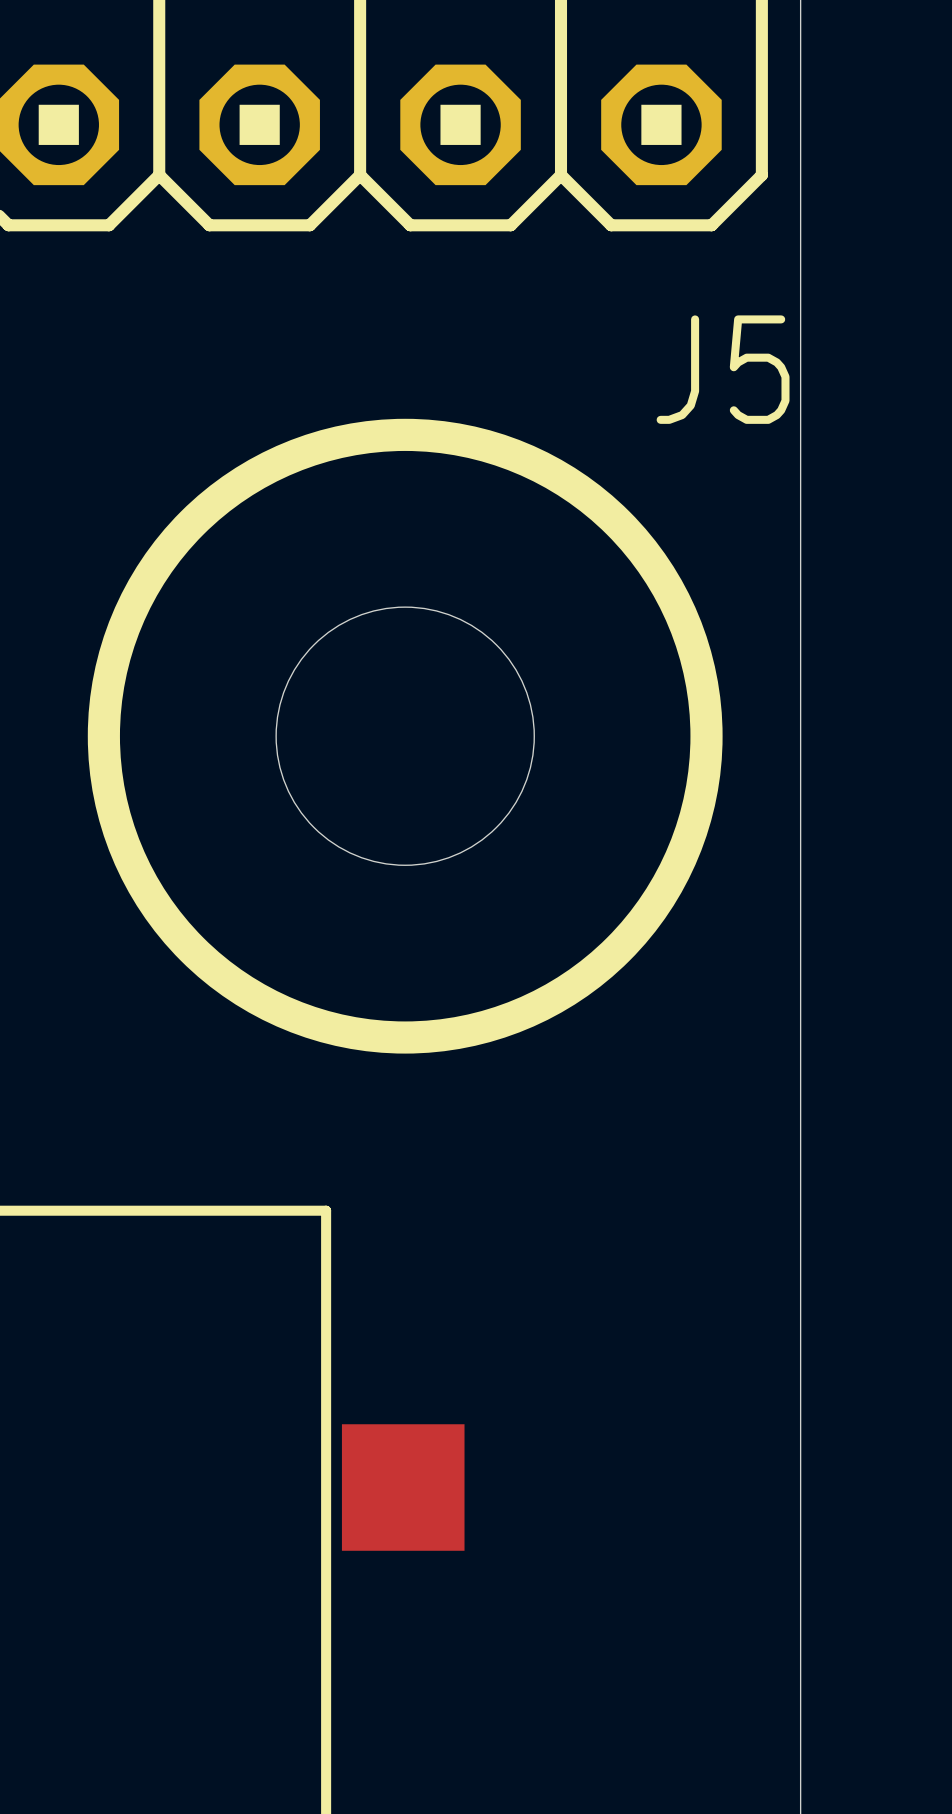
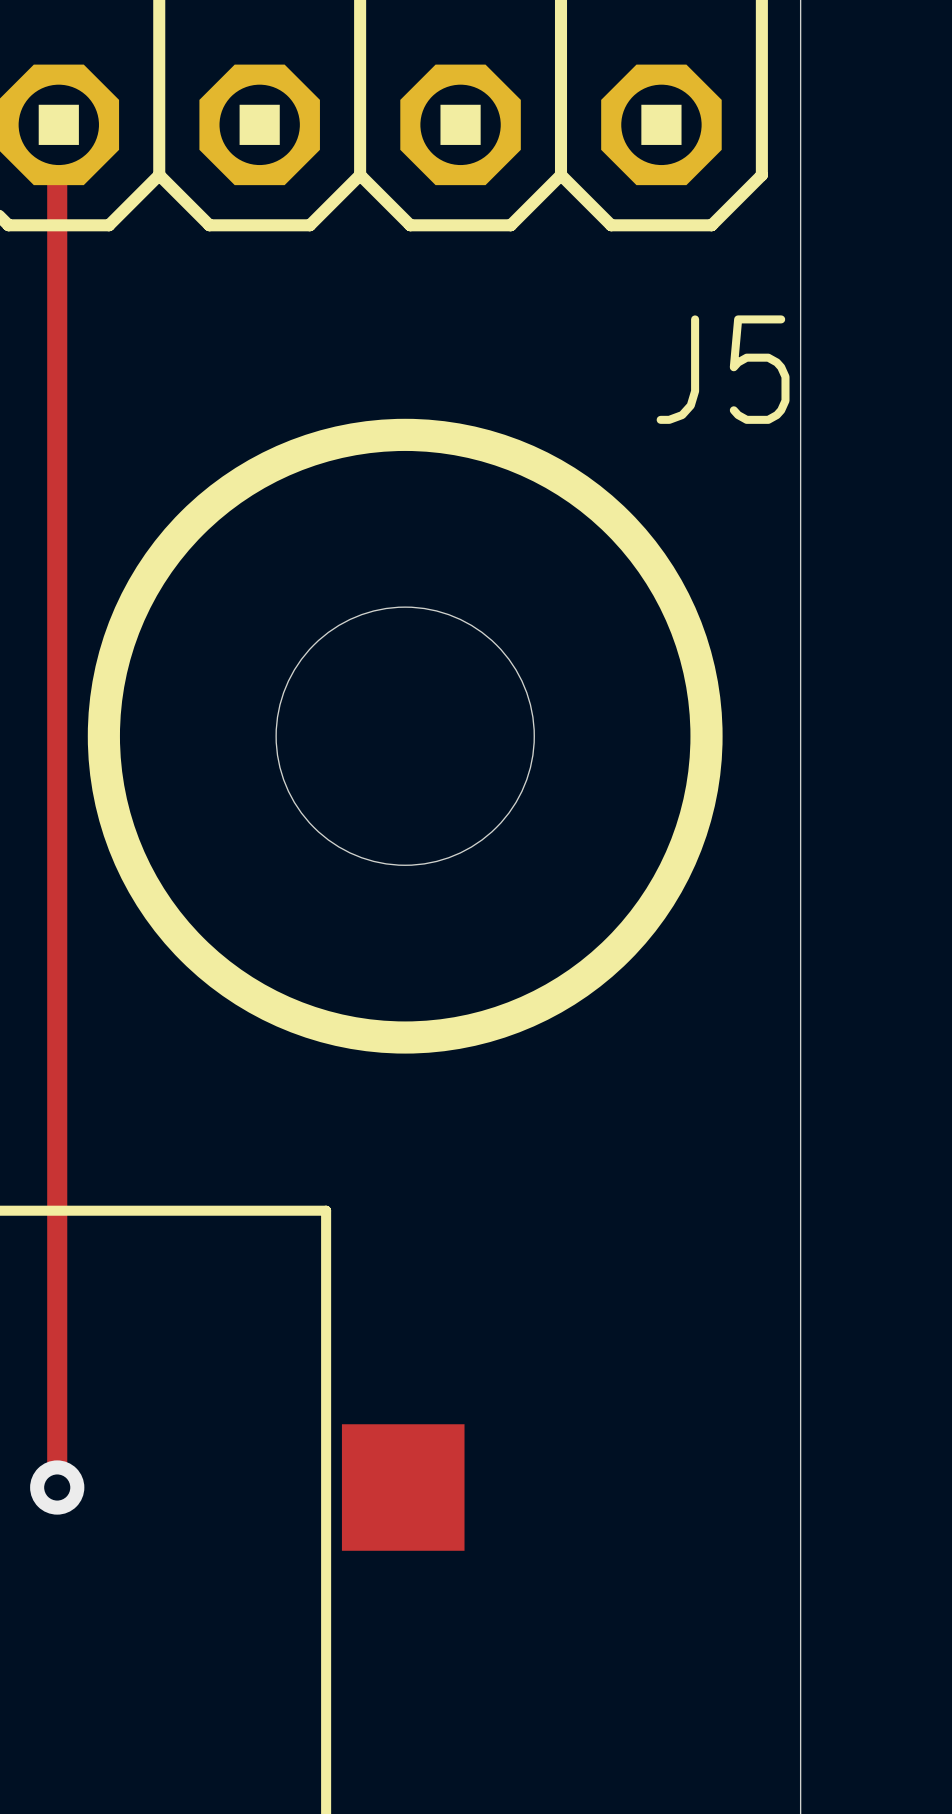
track: none -> (58, 124) (57, 127) (57, 1487)
via: none -> (57, 1487)

